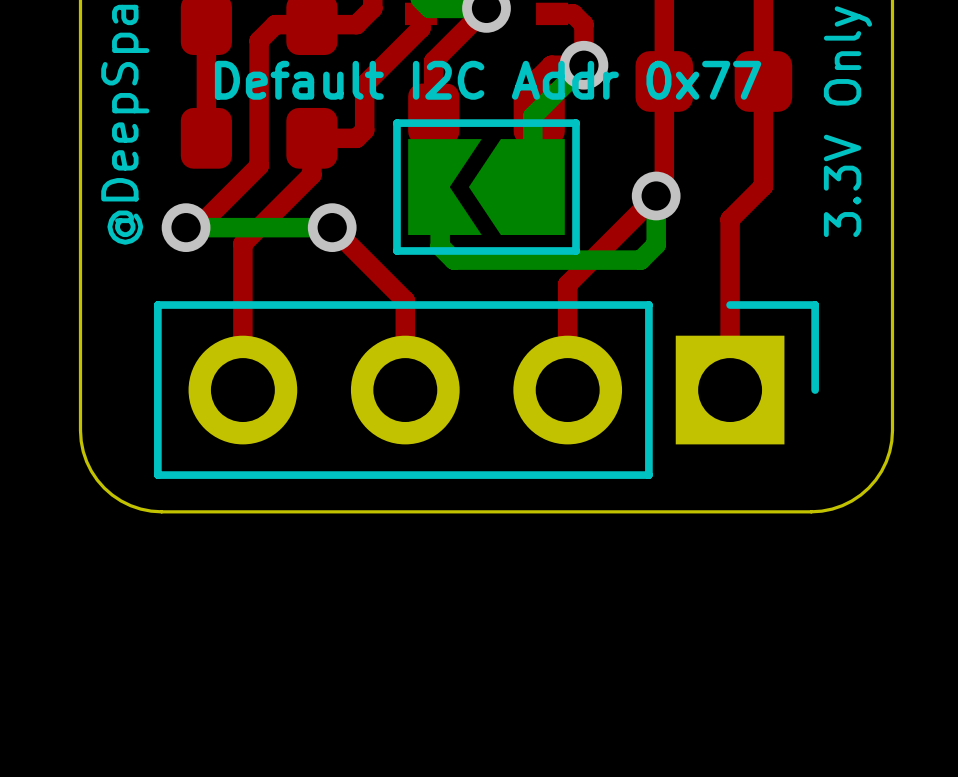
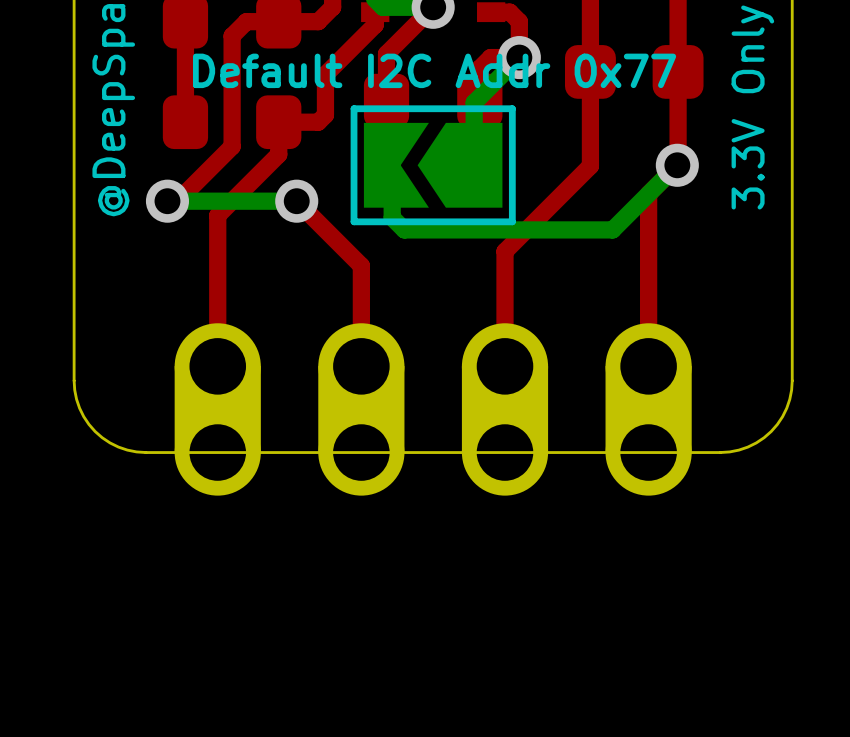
bottom track: (656, 195) (656, 244) (640, 260) -> (677, 165) (612, 229) (569, 229)
via position: (656, 195) -> (677, 165)
part: (486, 390) -> none
part: none -> (433, 409)

